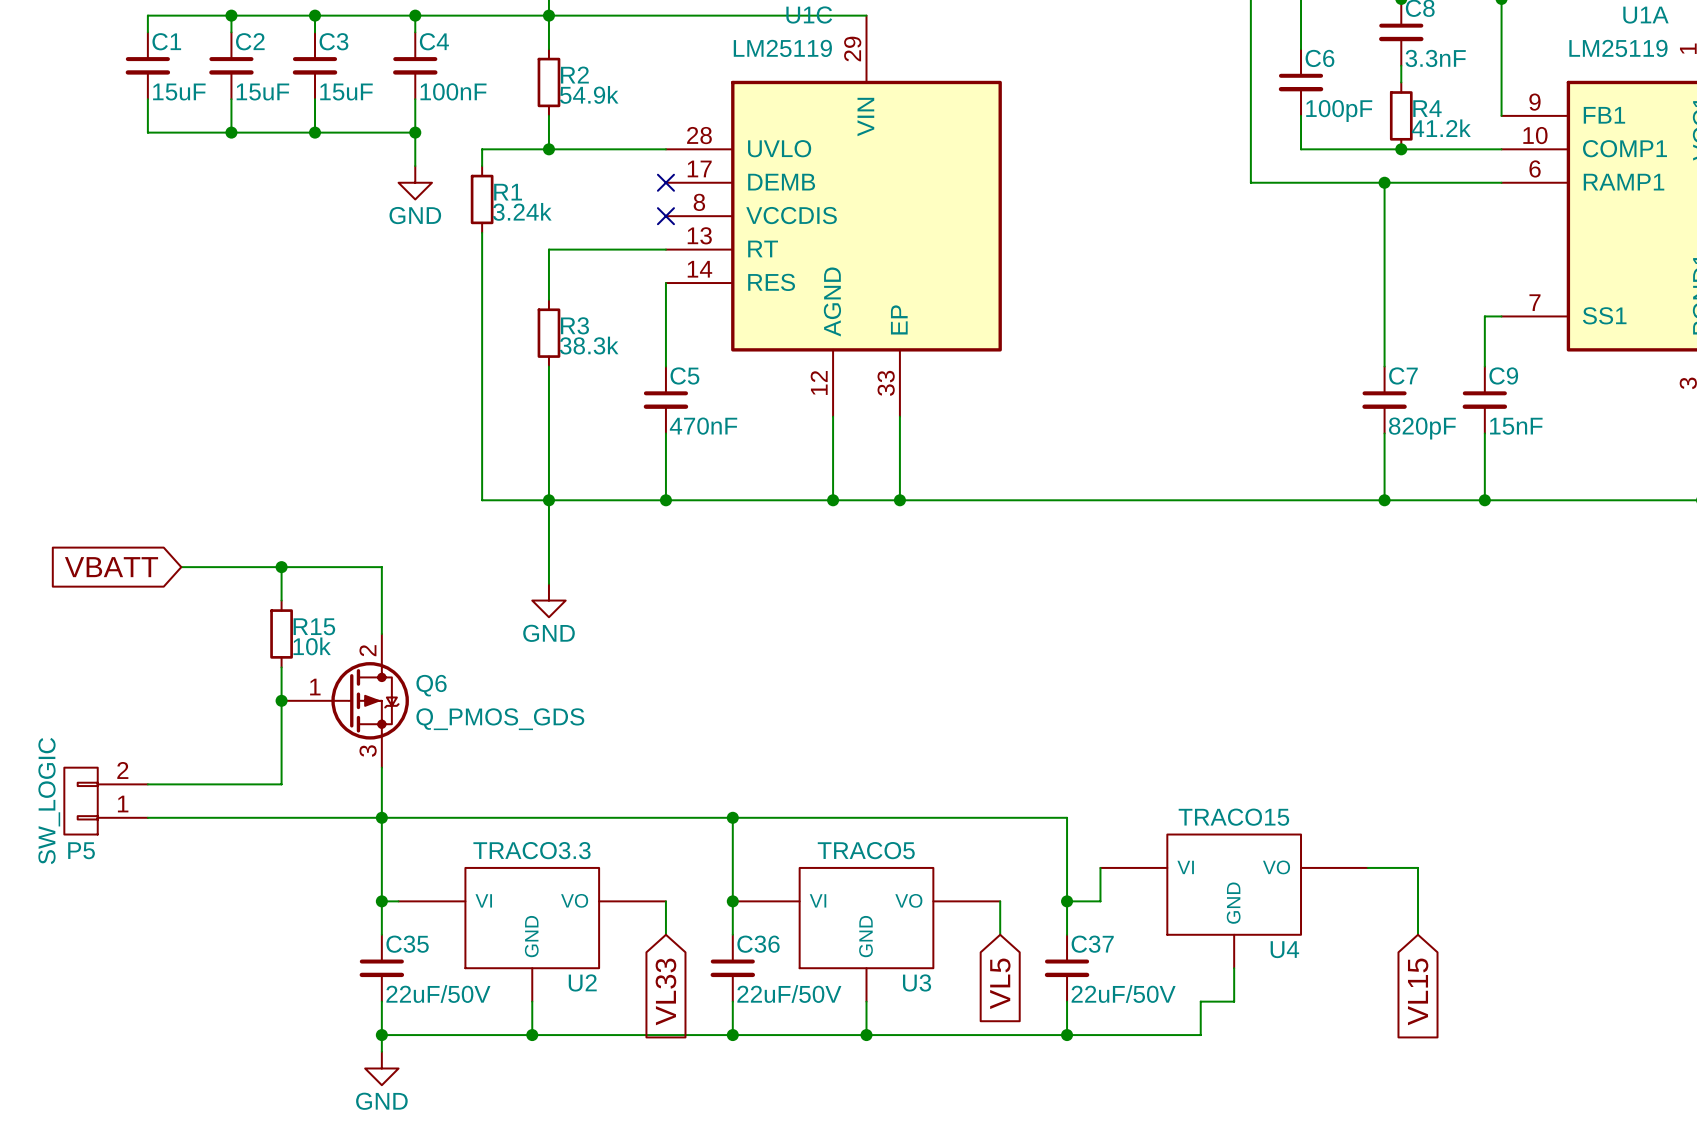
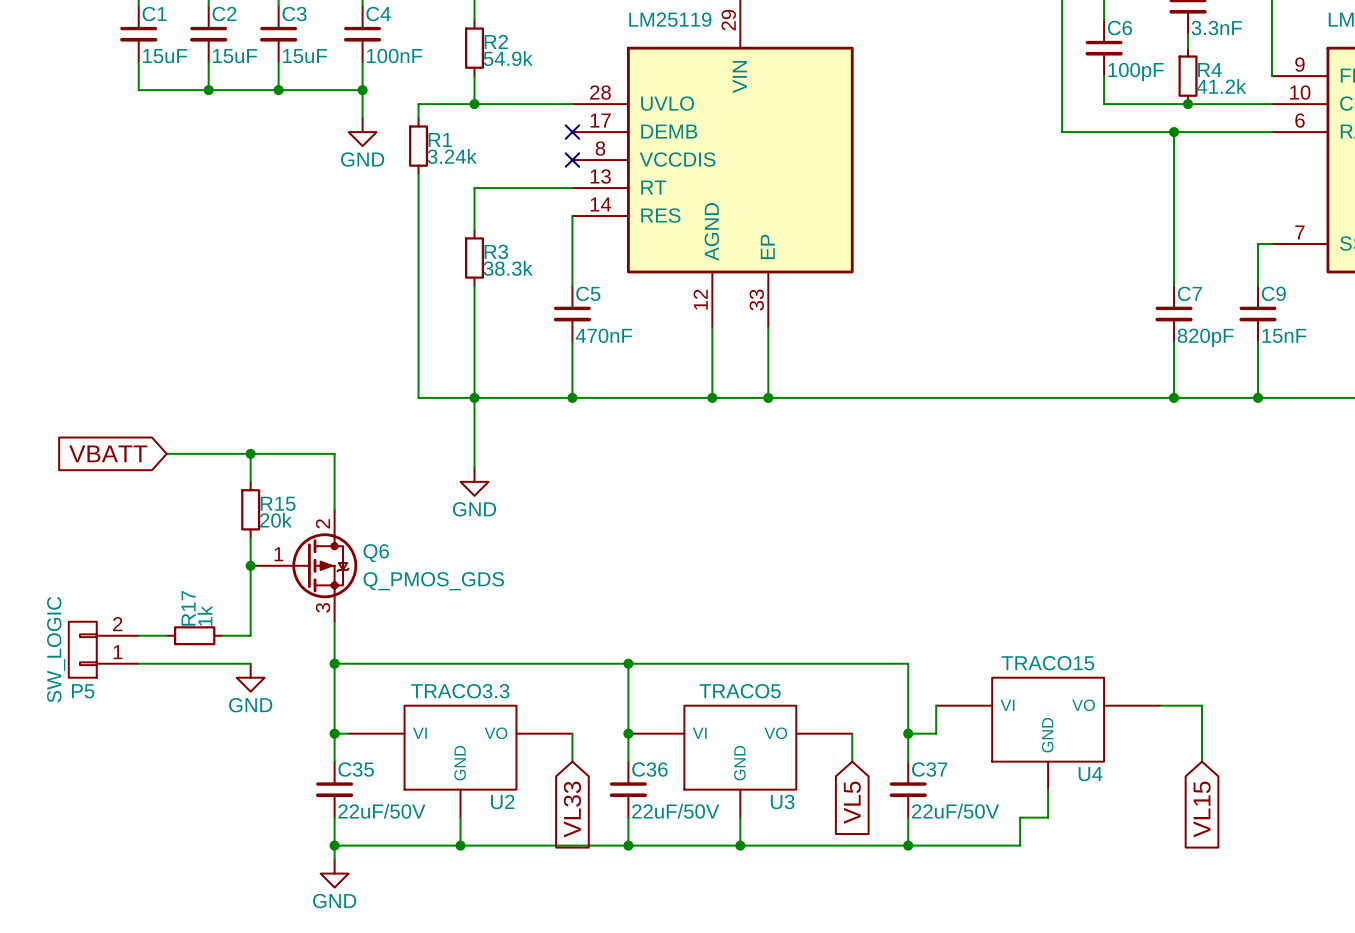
R15 value: 10k (312, 646) -> 20k (275, 520)
wire: (181, 784) (248, 784) -> none
R17: none -> 1k (194, 635)
wire: (281, 817) (381, 817) -> none
power symbol: none -> GND (250, 677)

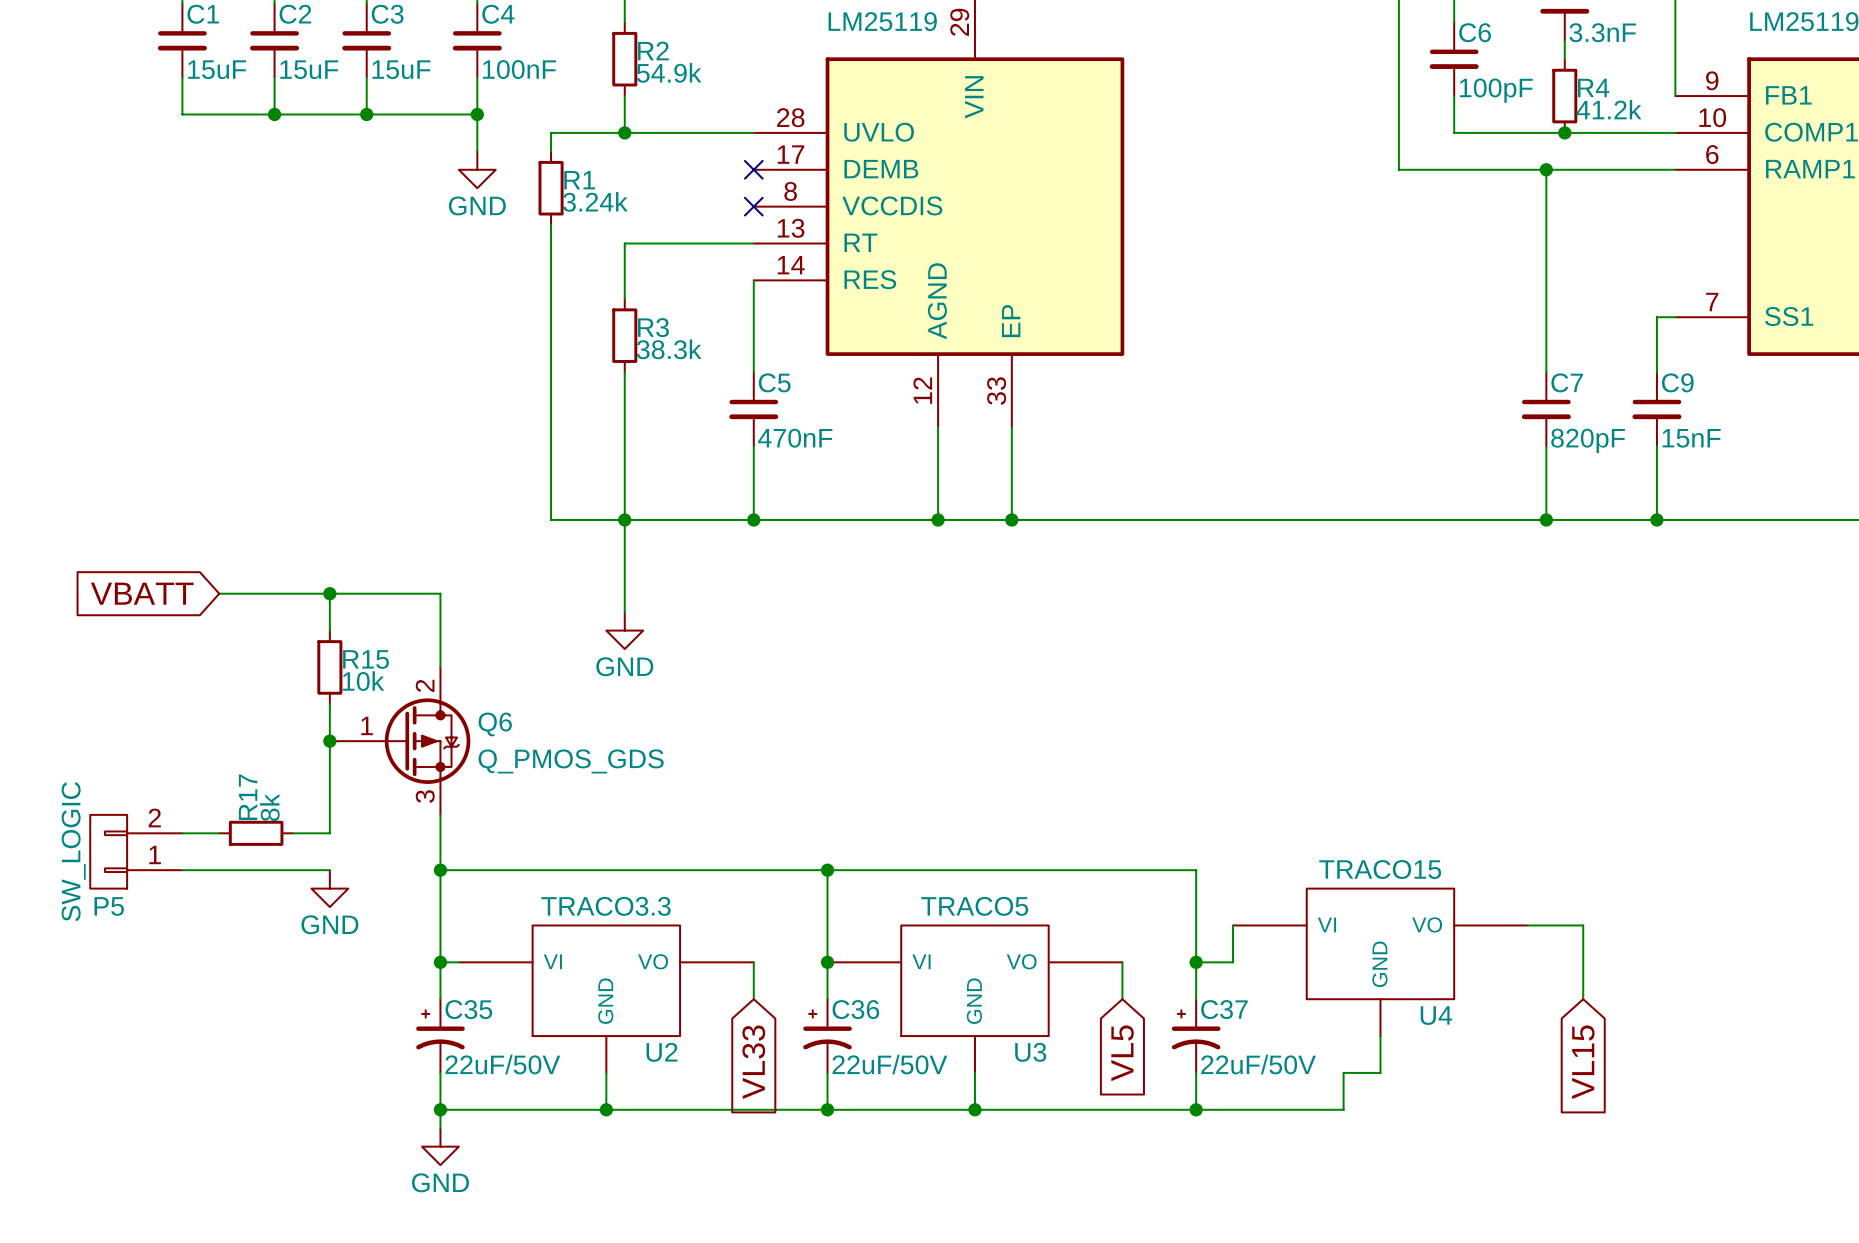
R15 value: 20k (275, 520) -> 10k (363, 681)
R17 value: 1k (204, 615) -> 8k (269, 807)
C35 symbol: [315, 761, 354, 818] -> [416, 999, 465, 1073]
C36 symbol: [609, 761, 648, 818] -> [803, 999, 852, 1073]
C37 symbol: [889, 761, 927, 818] -> [1171, 999, 1221, 1073]

